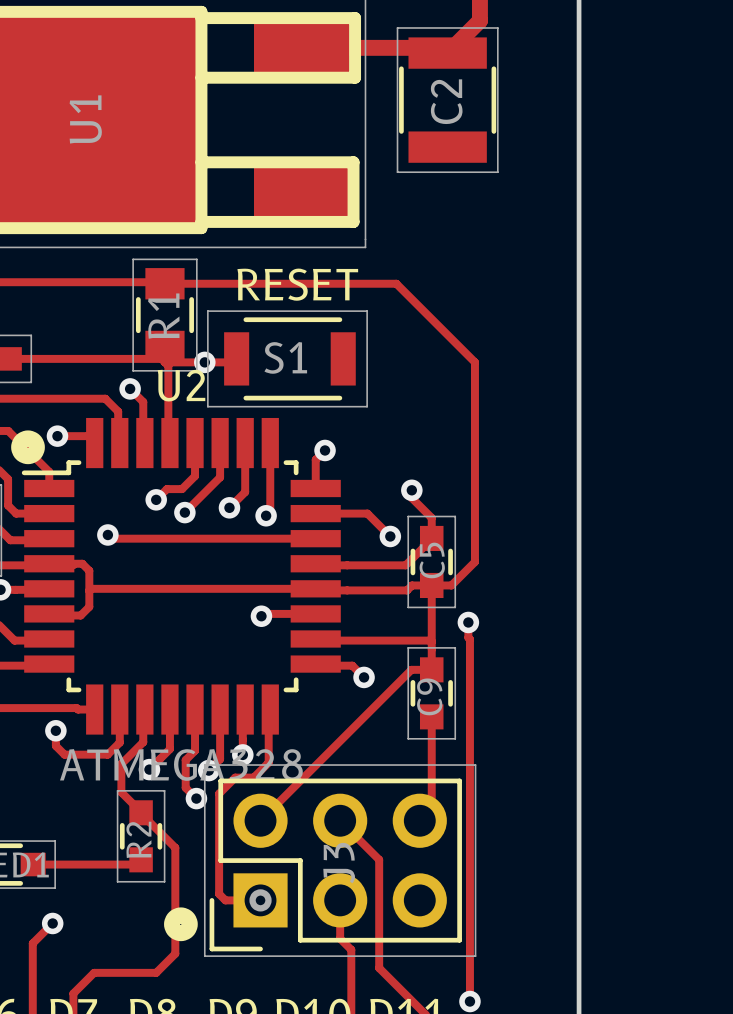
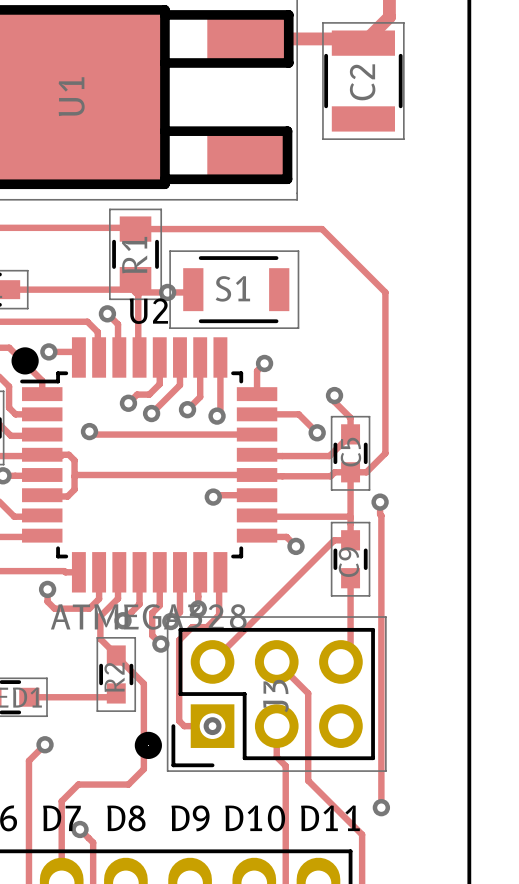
text: RESET (297, 284) -> none

